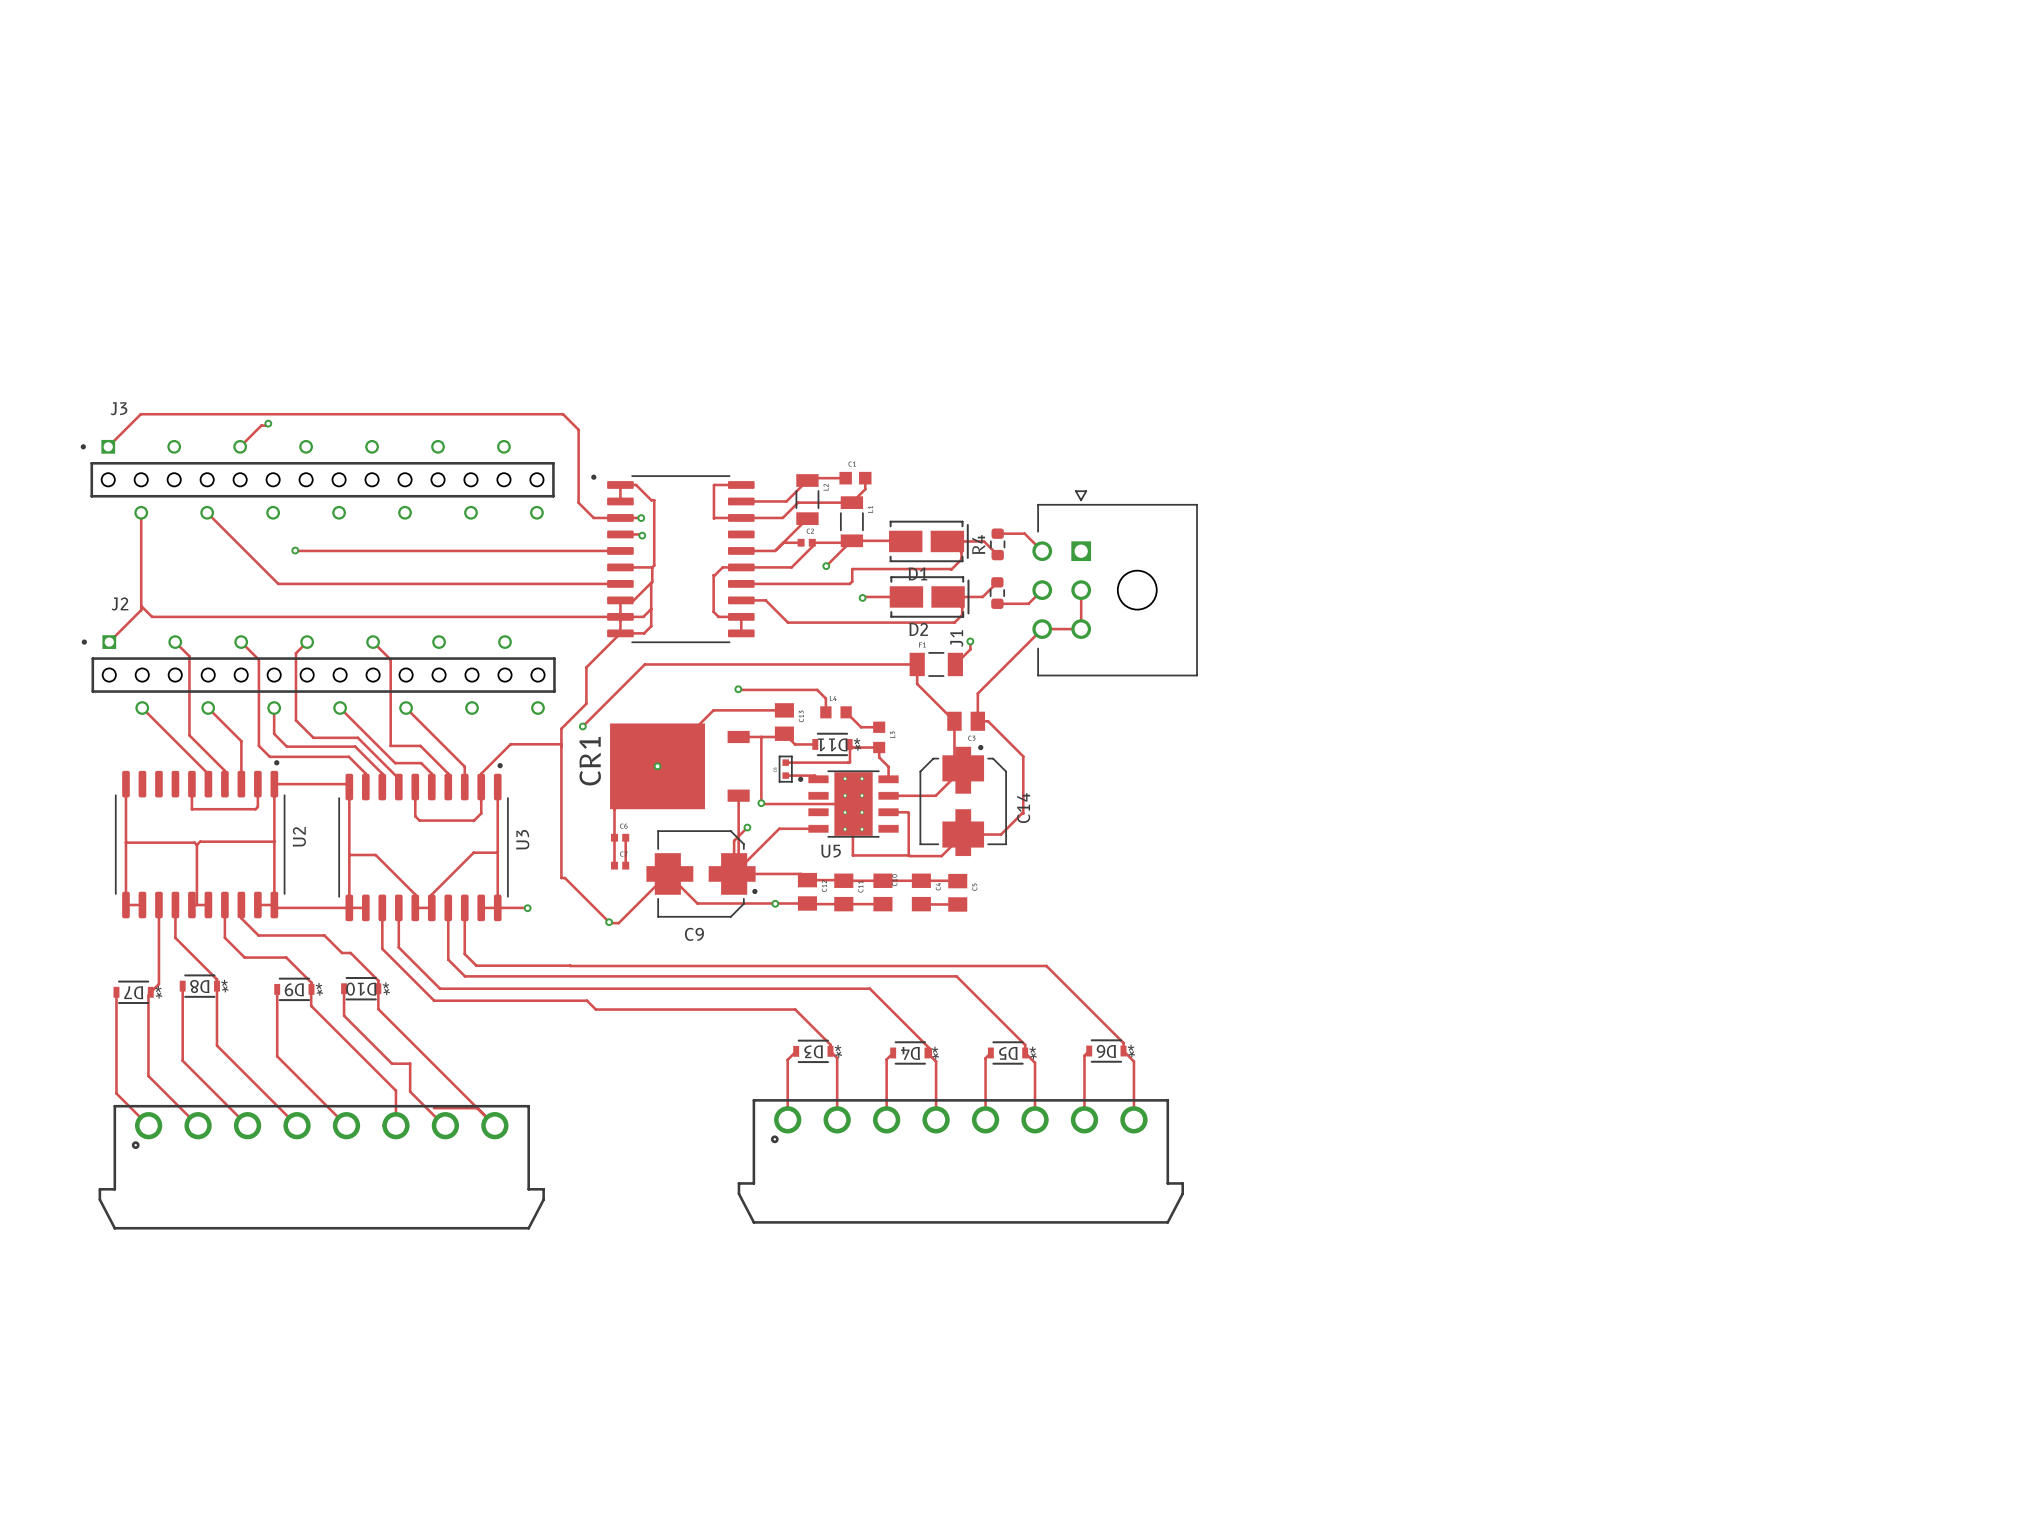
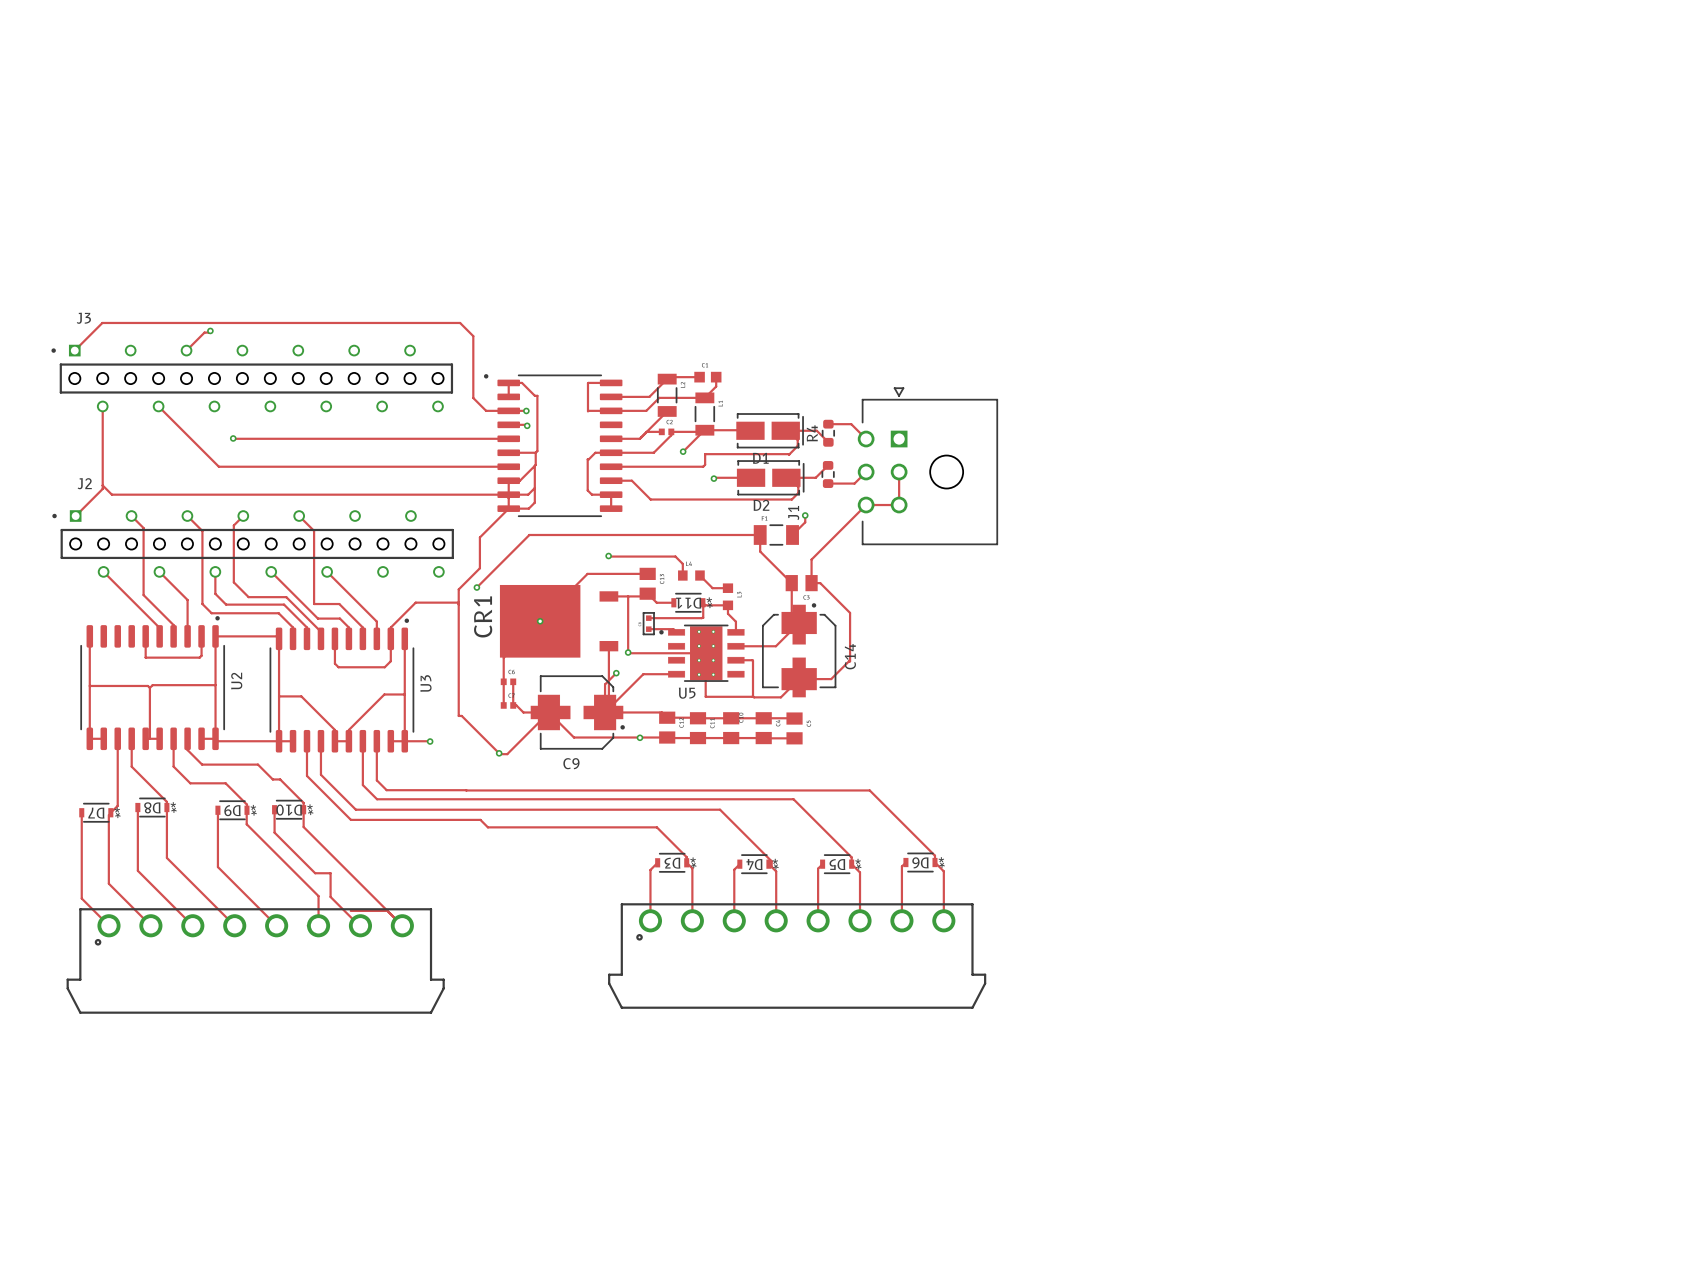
track: none -> (513, 705) (516, 705) (523, 712) (548, 712)
track: none -> (731, 738) (763, 738)

